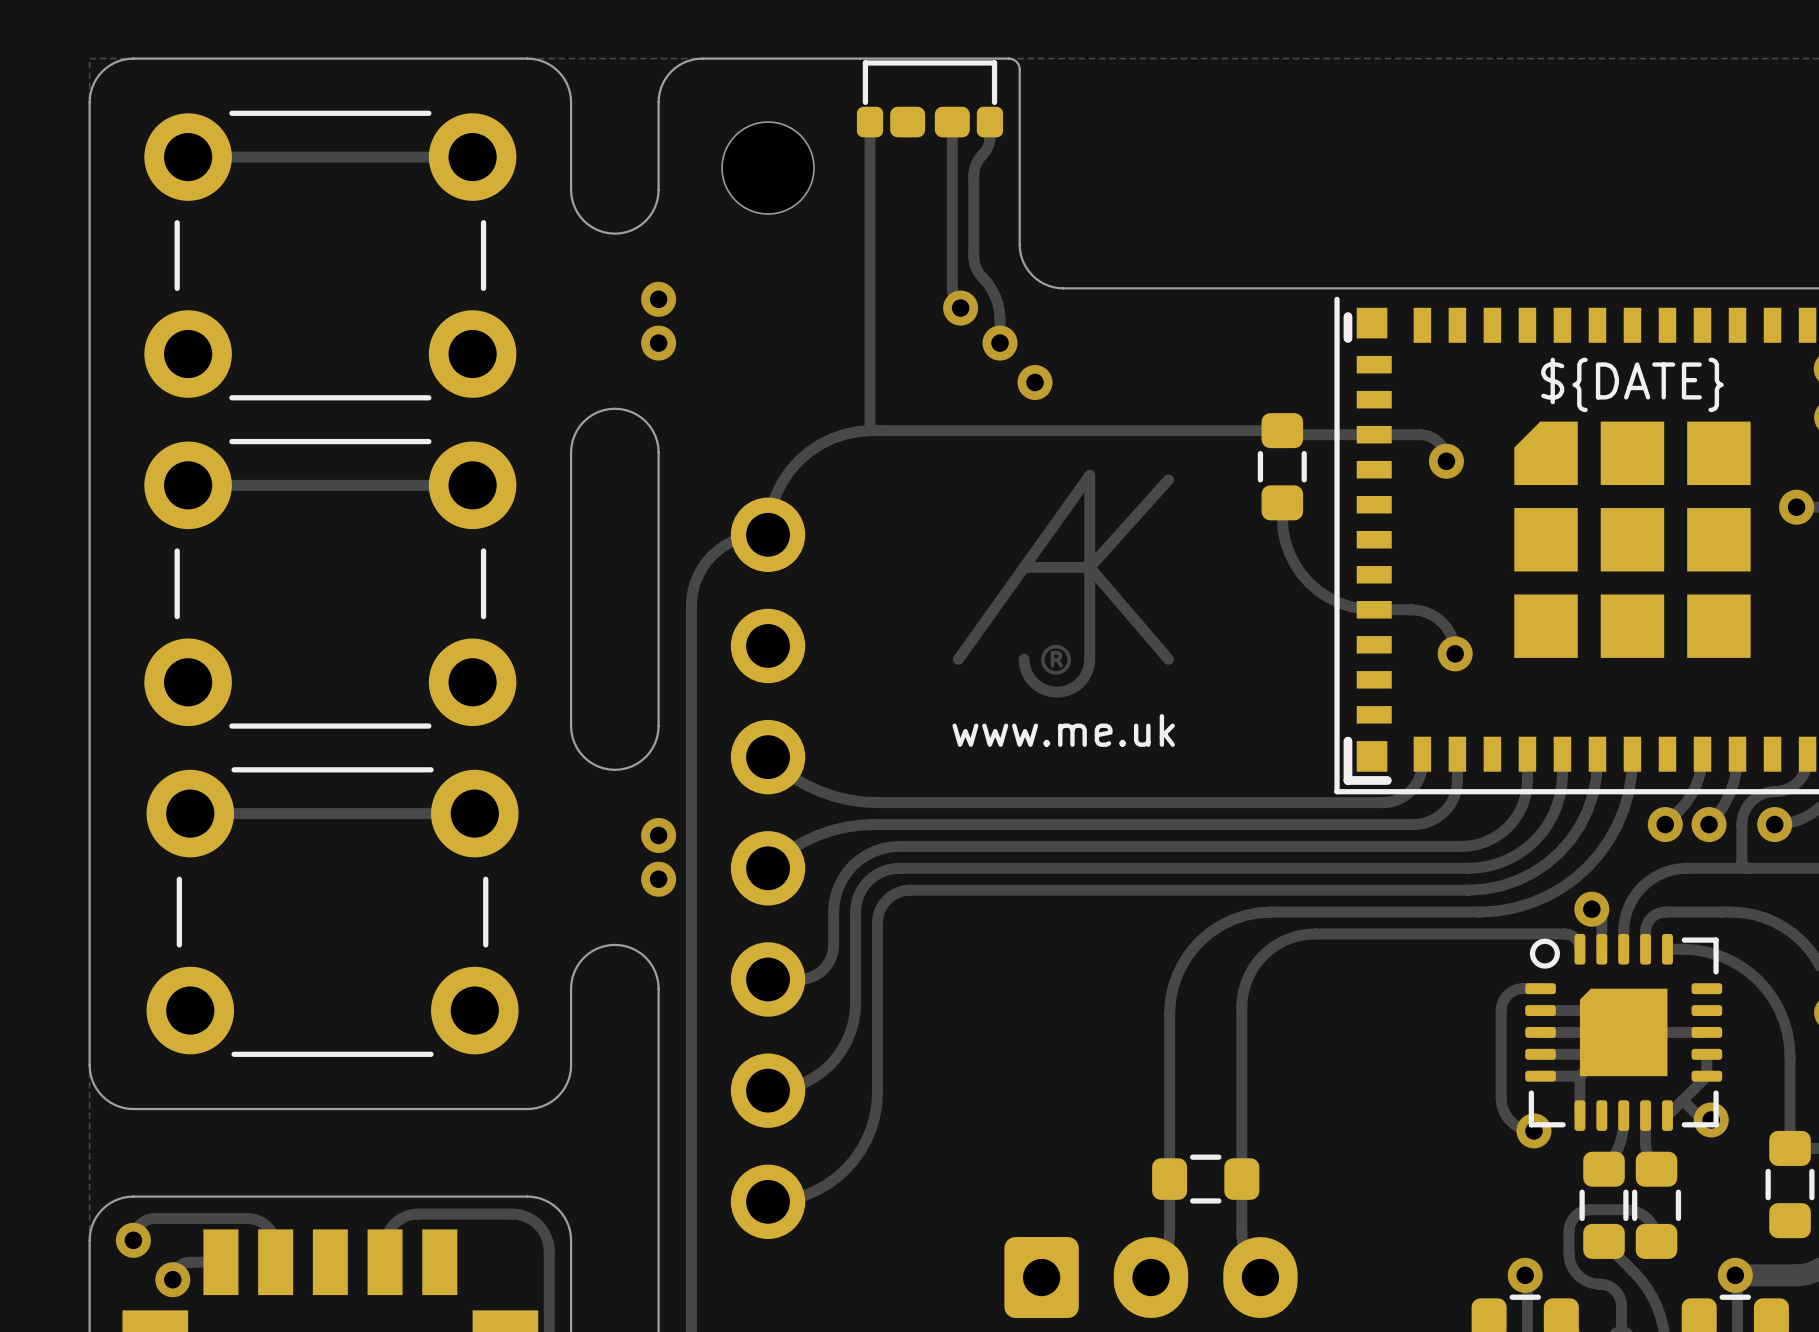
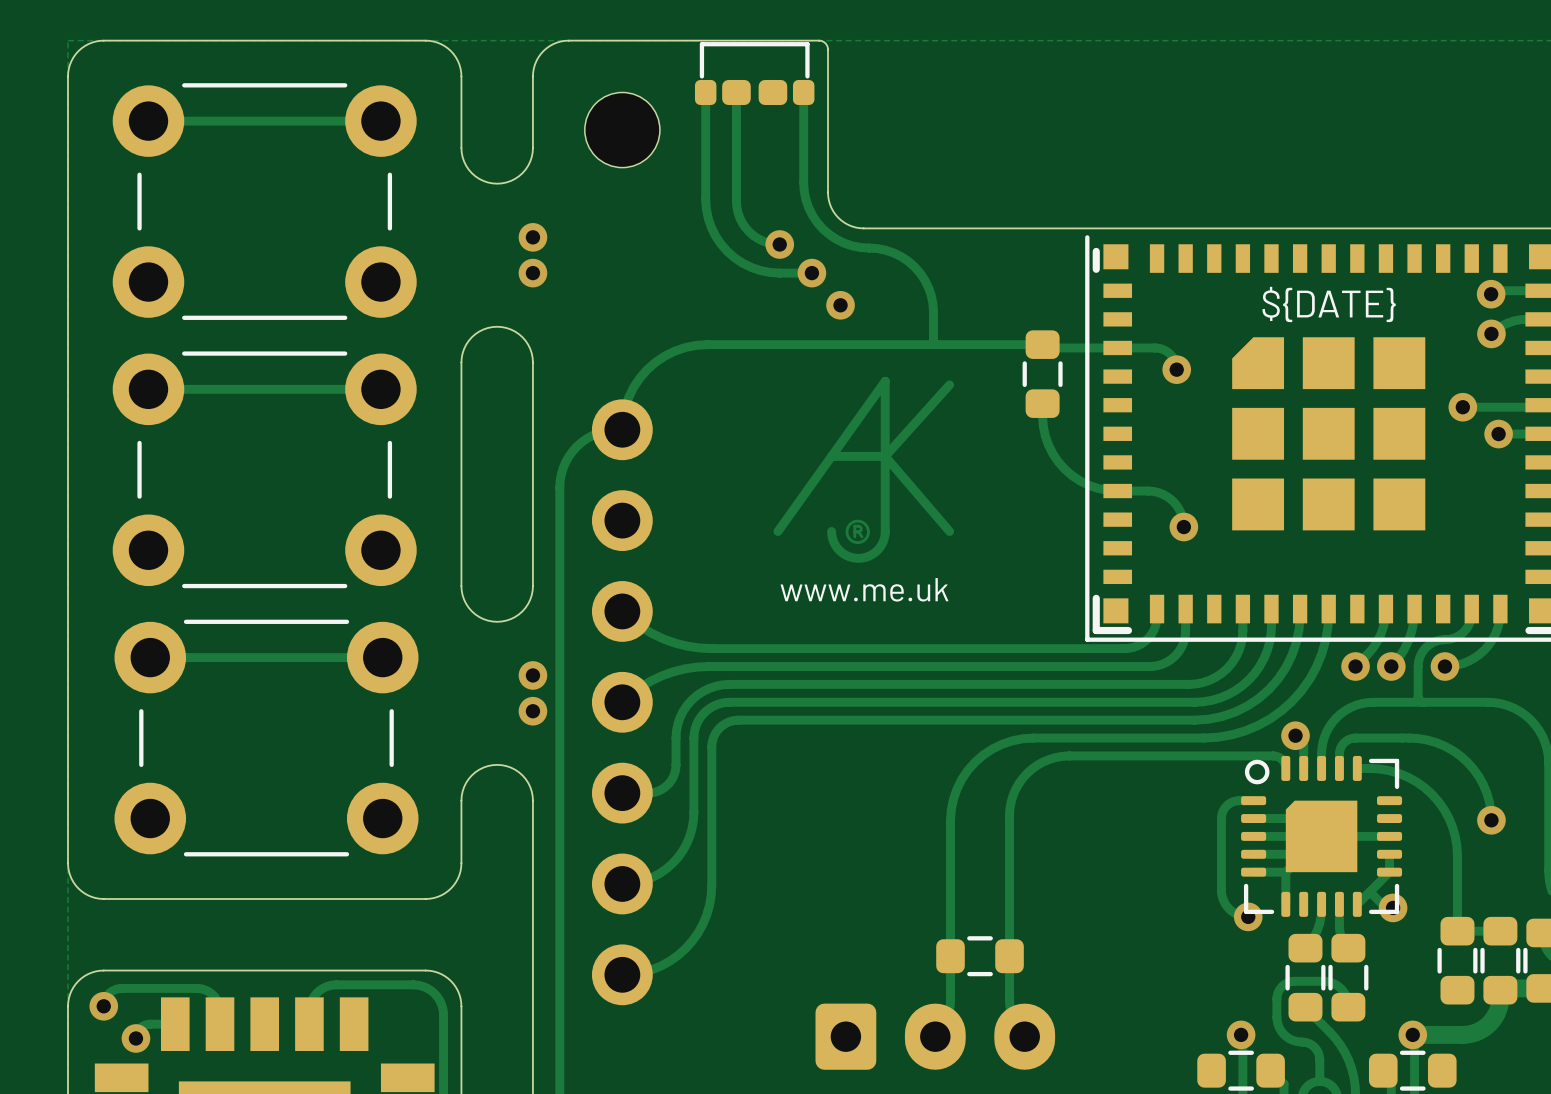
track: (952, 122) (952, 288) (954, 298) (960, 308) -> (736, 92) (737, 212) (745, 227) (753, 235) (763, 241) (779, 244)
track: (989, 136) (988, 146) (977, 161) (973, 173) (973, 256) (977, 271) (992, 289) (997, 304) (1000, 343) -> (803, 104) (804, 191) (812, 215) (822, 228) (836, 239) (852, 245) (877, 248) (893, 252) (914, 266) (924, 280) (931, 295) (933, 341) (937, 344)
track: (870, 252) (870, 428) (872, 430) -> (705, 199) (711, 227) (720, 244) (734, 257) (751, 267) (770, 272) (811, 273)

